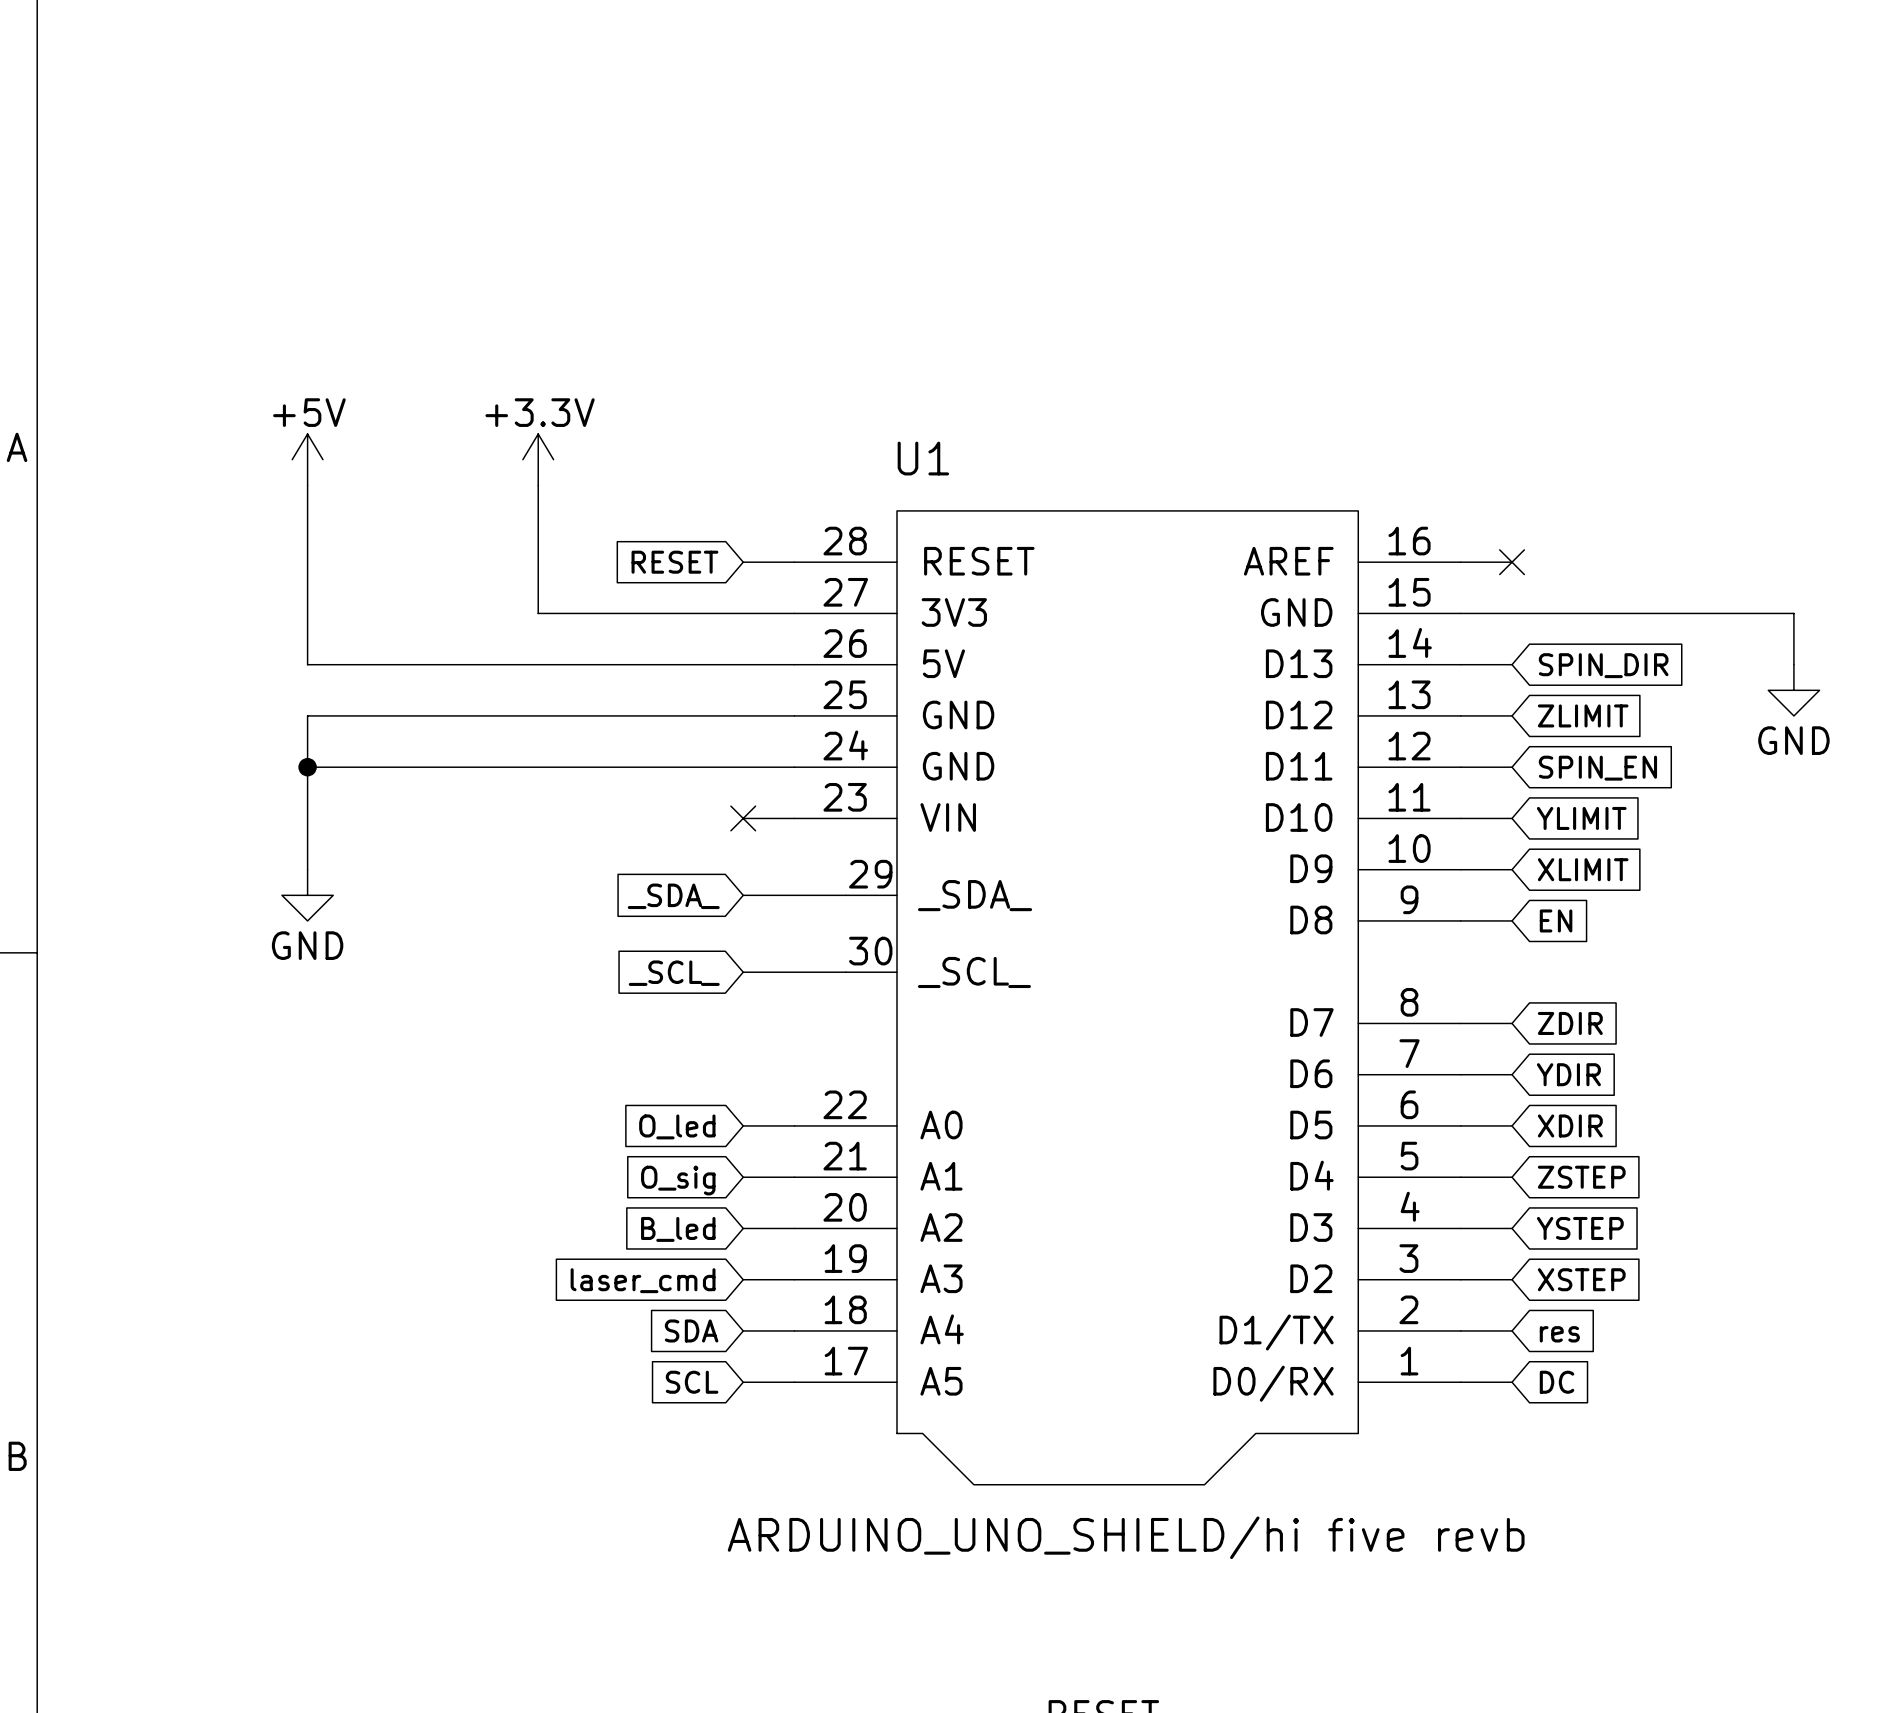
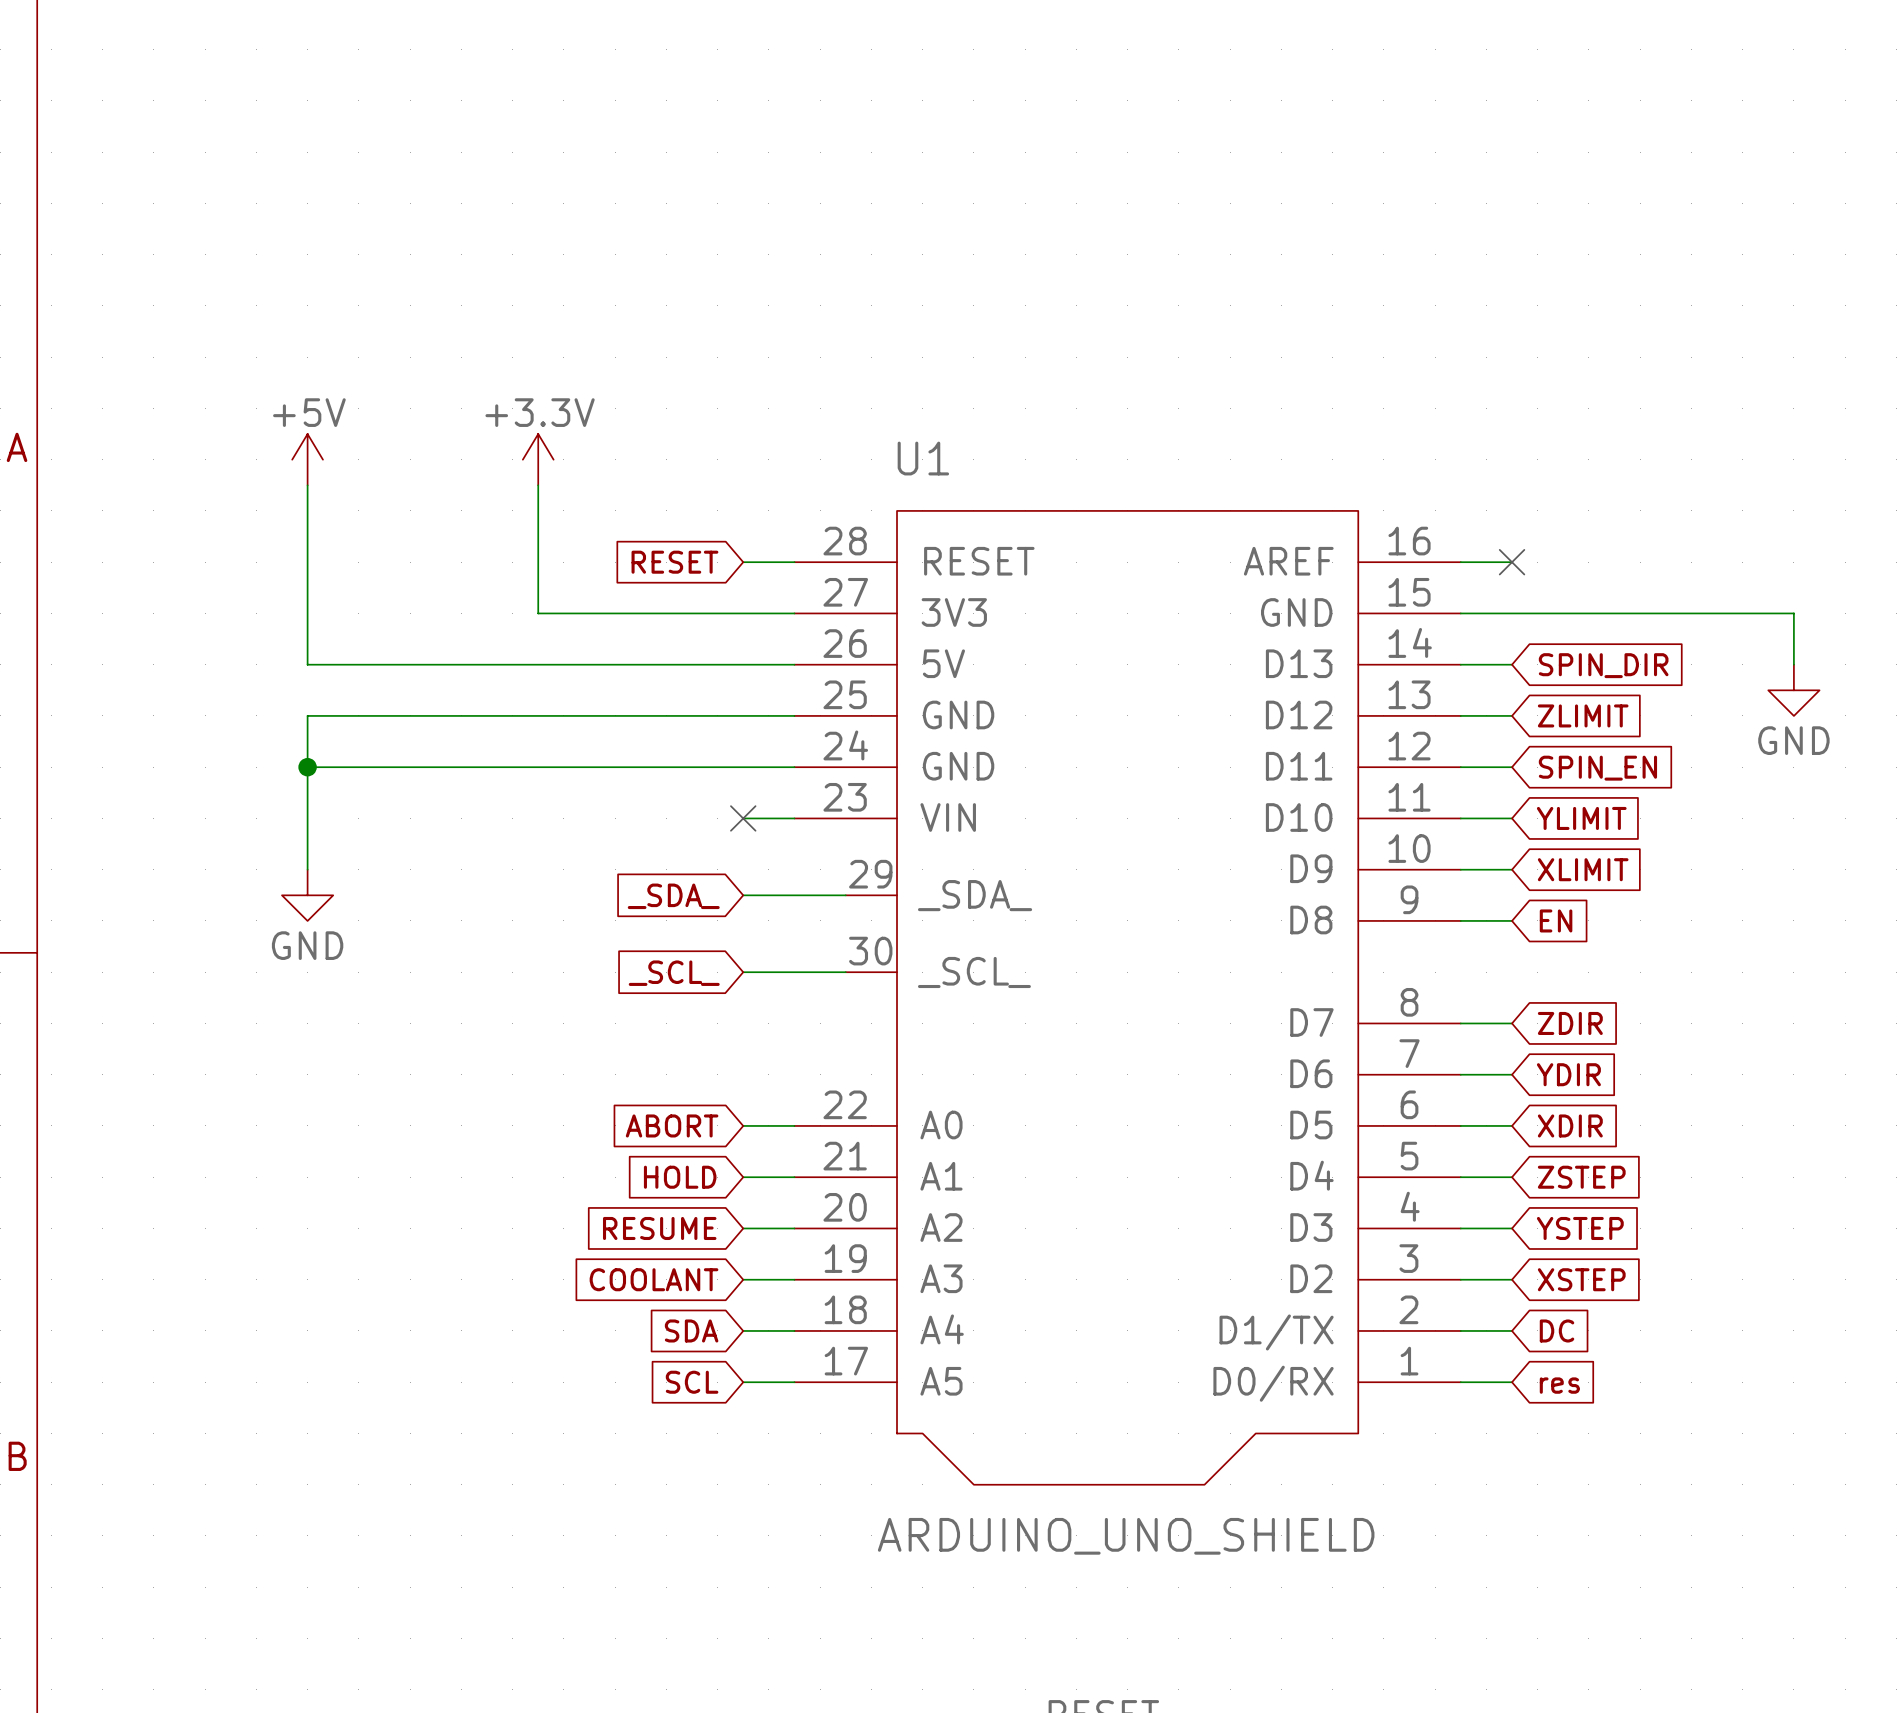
global label: O_led (677, 1126) -> ABORT (672, 1125)
global label: O_sig (678, 1180) -> HOLD (680, 1177)
global label: B_led (678, 1229) -> RESUME (659, 1228)
global label: laser_cmd (643, 1280) -> COOLANT (654, 1279)
global label: res (1559, 1334) -> DC (1557, 1330)
global label: DC (1557, 1382) -> res (1559, 1385)
U1 value: ARDUINO_UNO_SHIELD/hi five revb (1126, 1537) -> ARDUINO_UNO_SHIELD (1126, 1536)

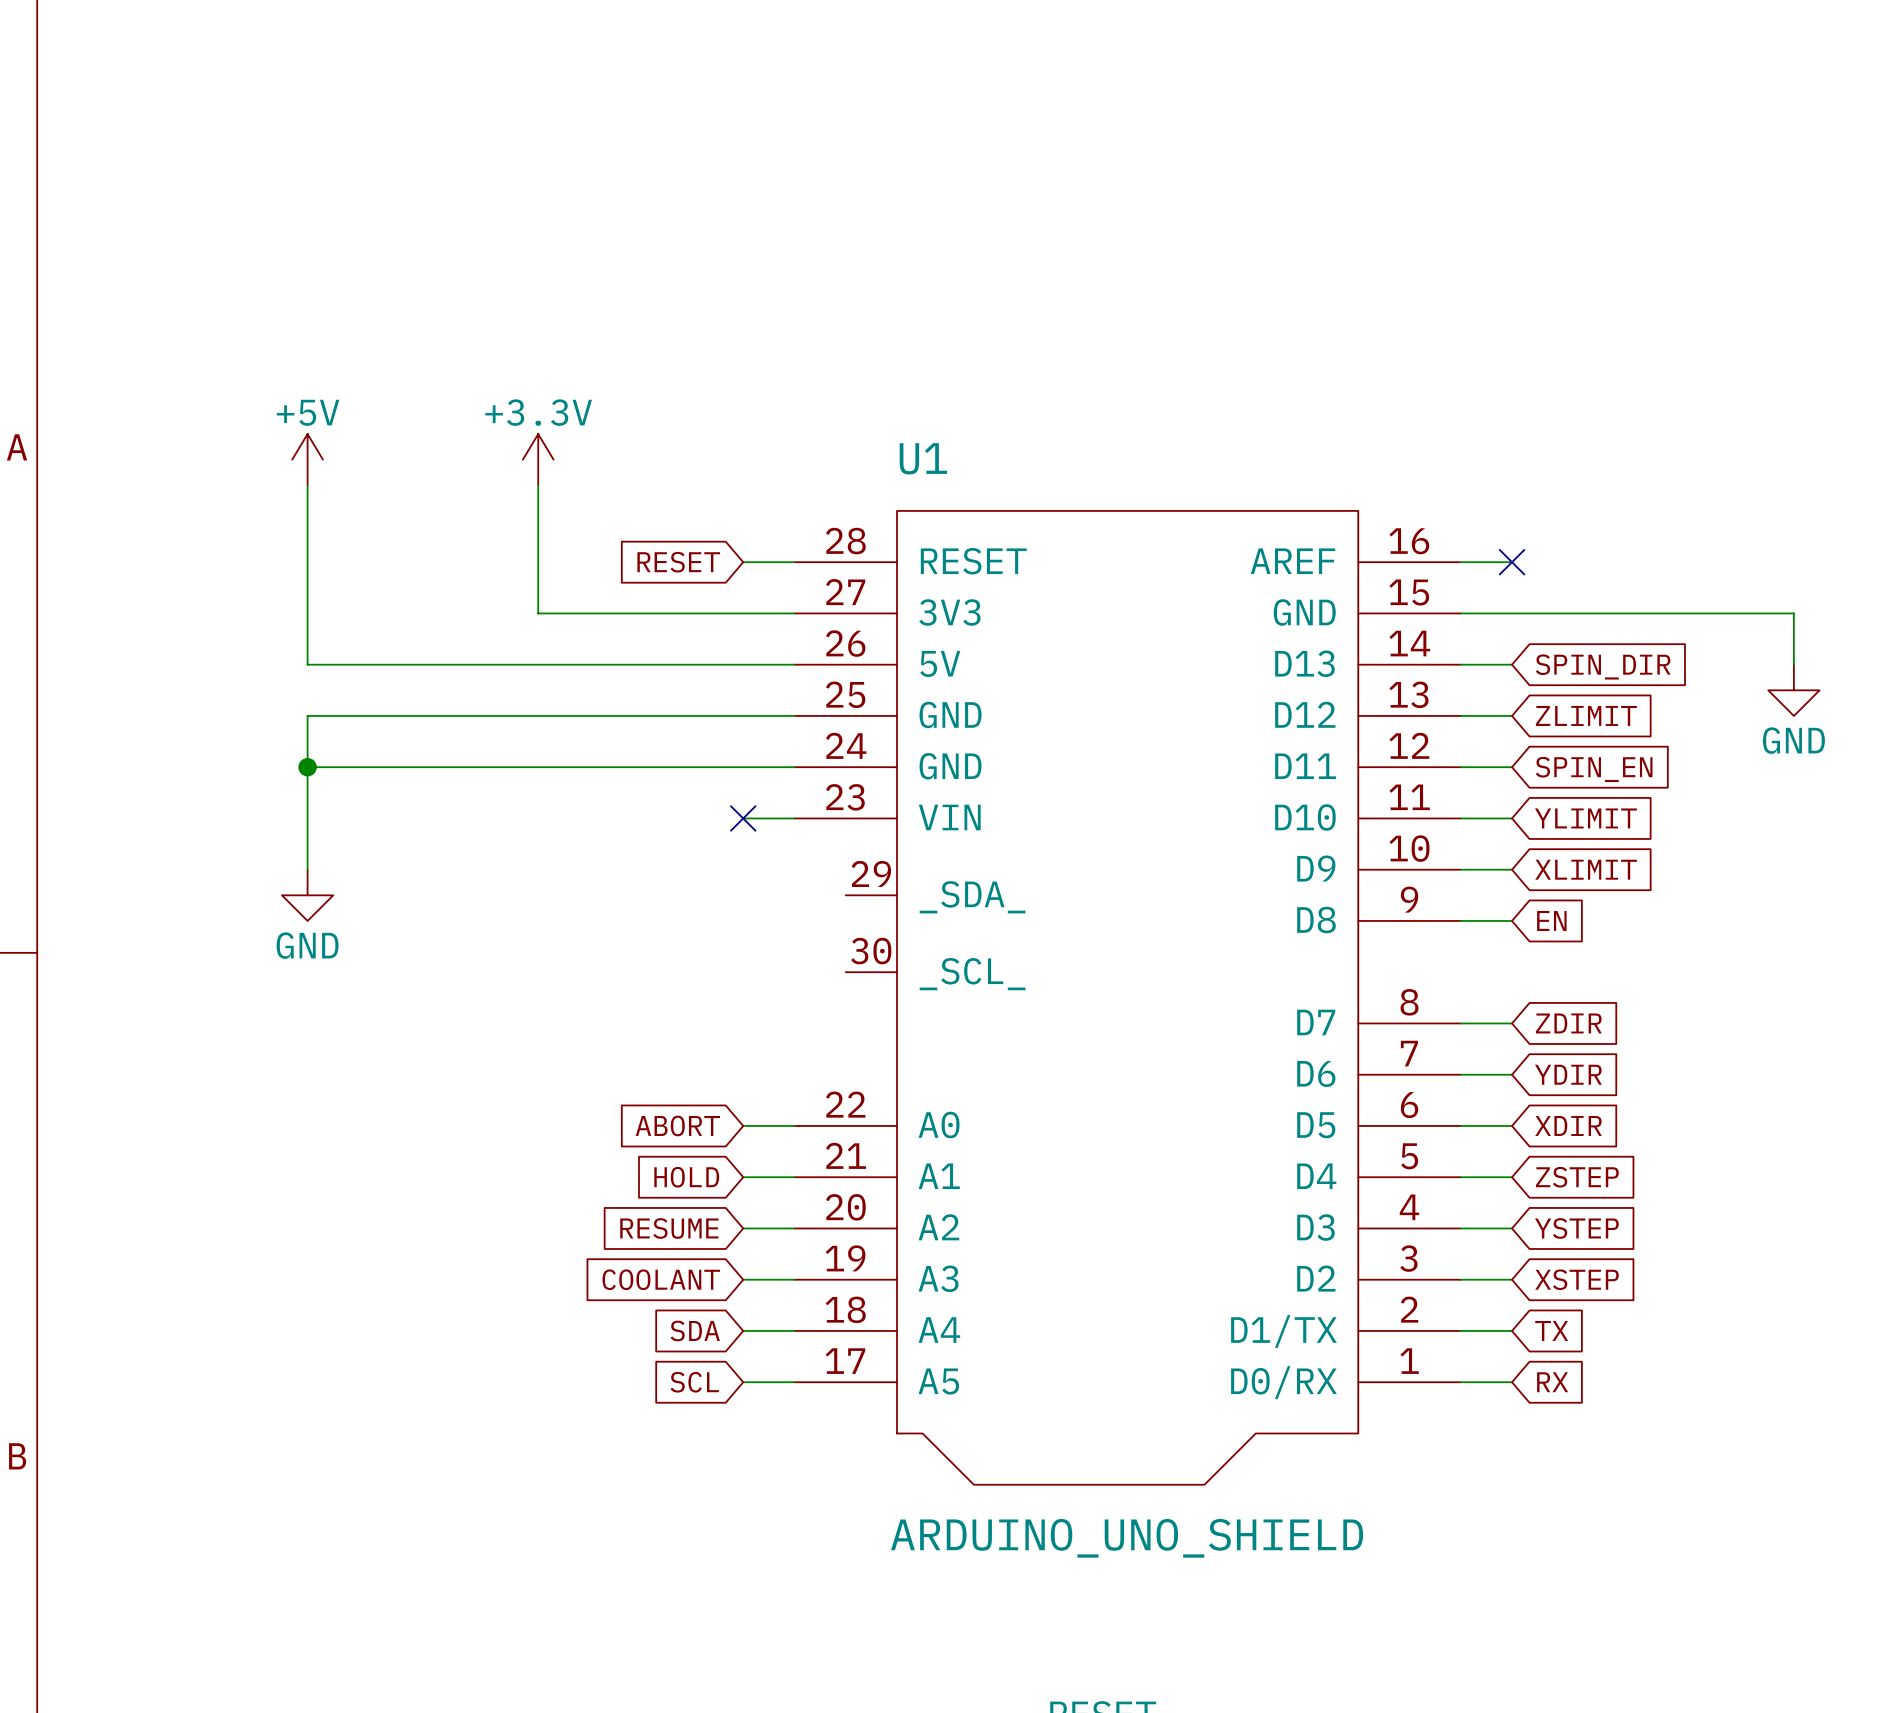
wire: (743, 895) (845, 895) -> none
global label: _SDA_ (673, 896) -> none
wire: (743, 972) (845, 972) -> none
global label: _SCL_ (674, 973) -> none
global label: DC (1557, 1330) -> TX (1551, 1330)
global label: res (1559, 1385) -> RX (1552, 1382)

